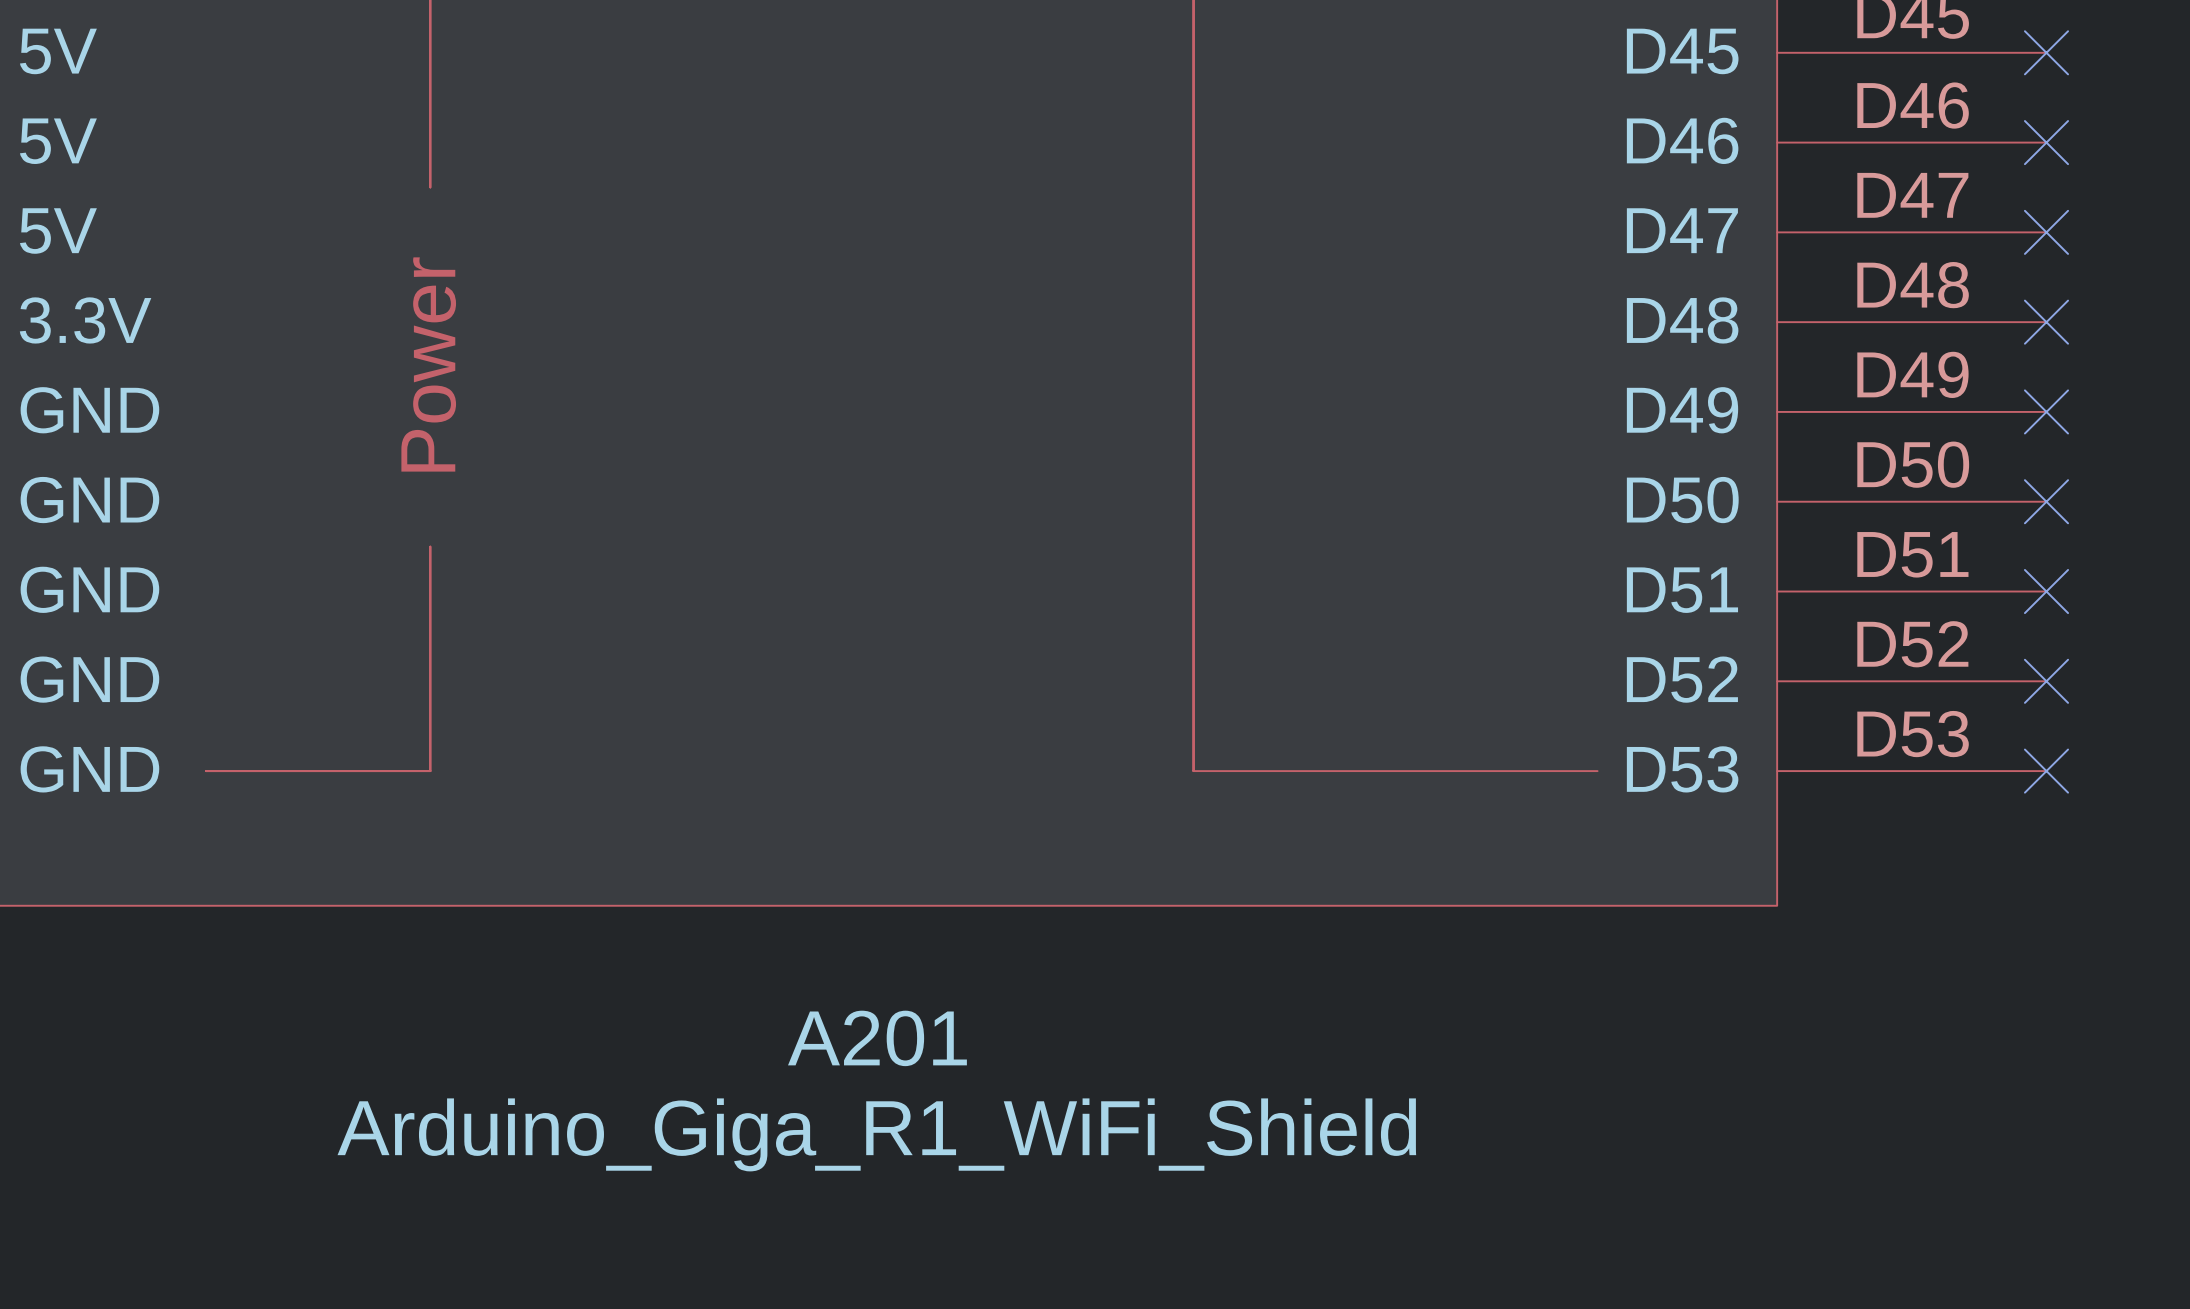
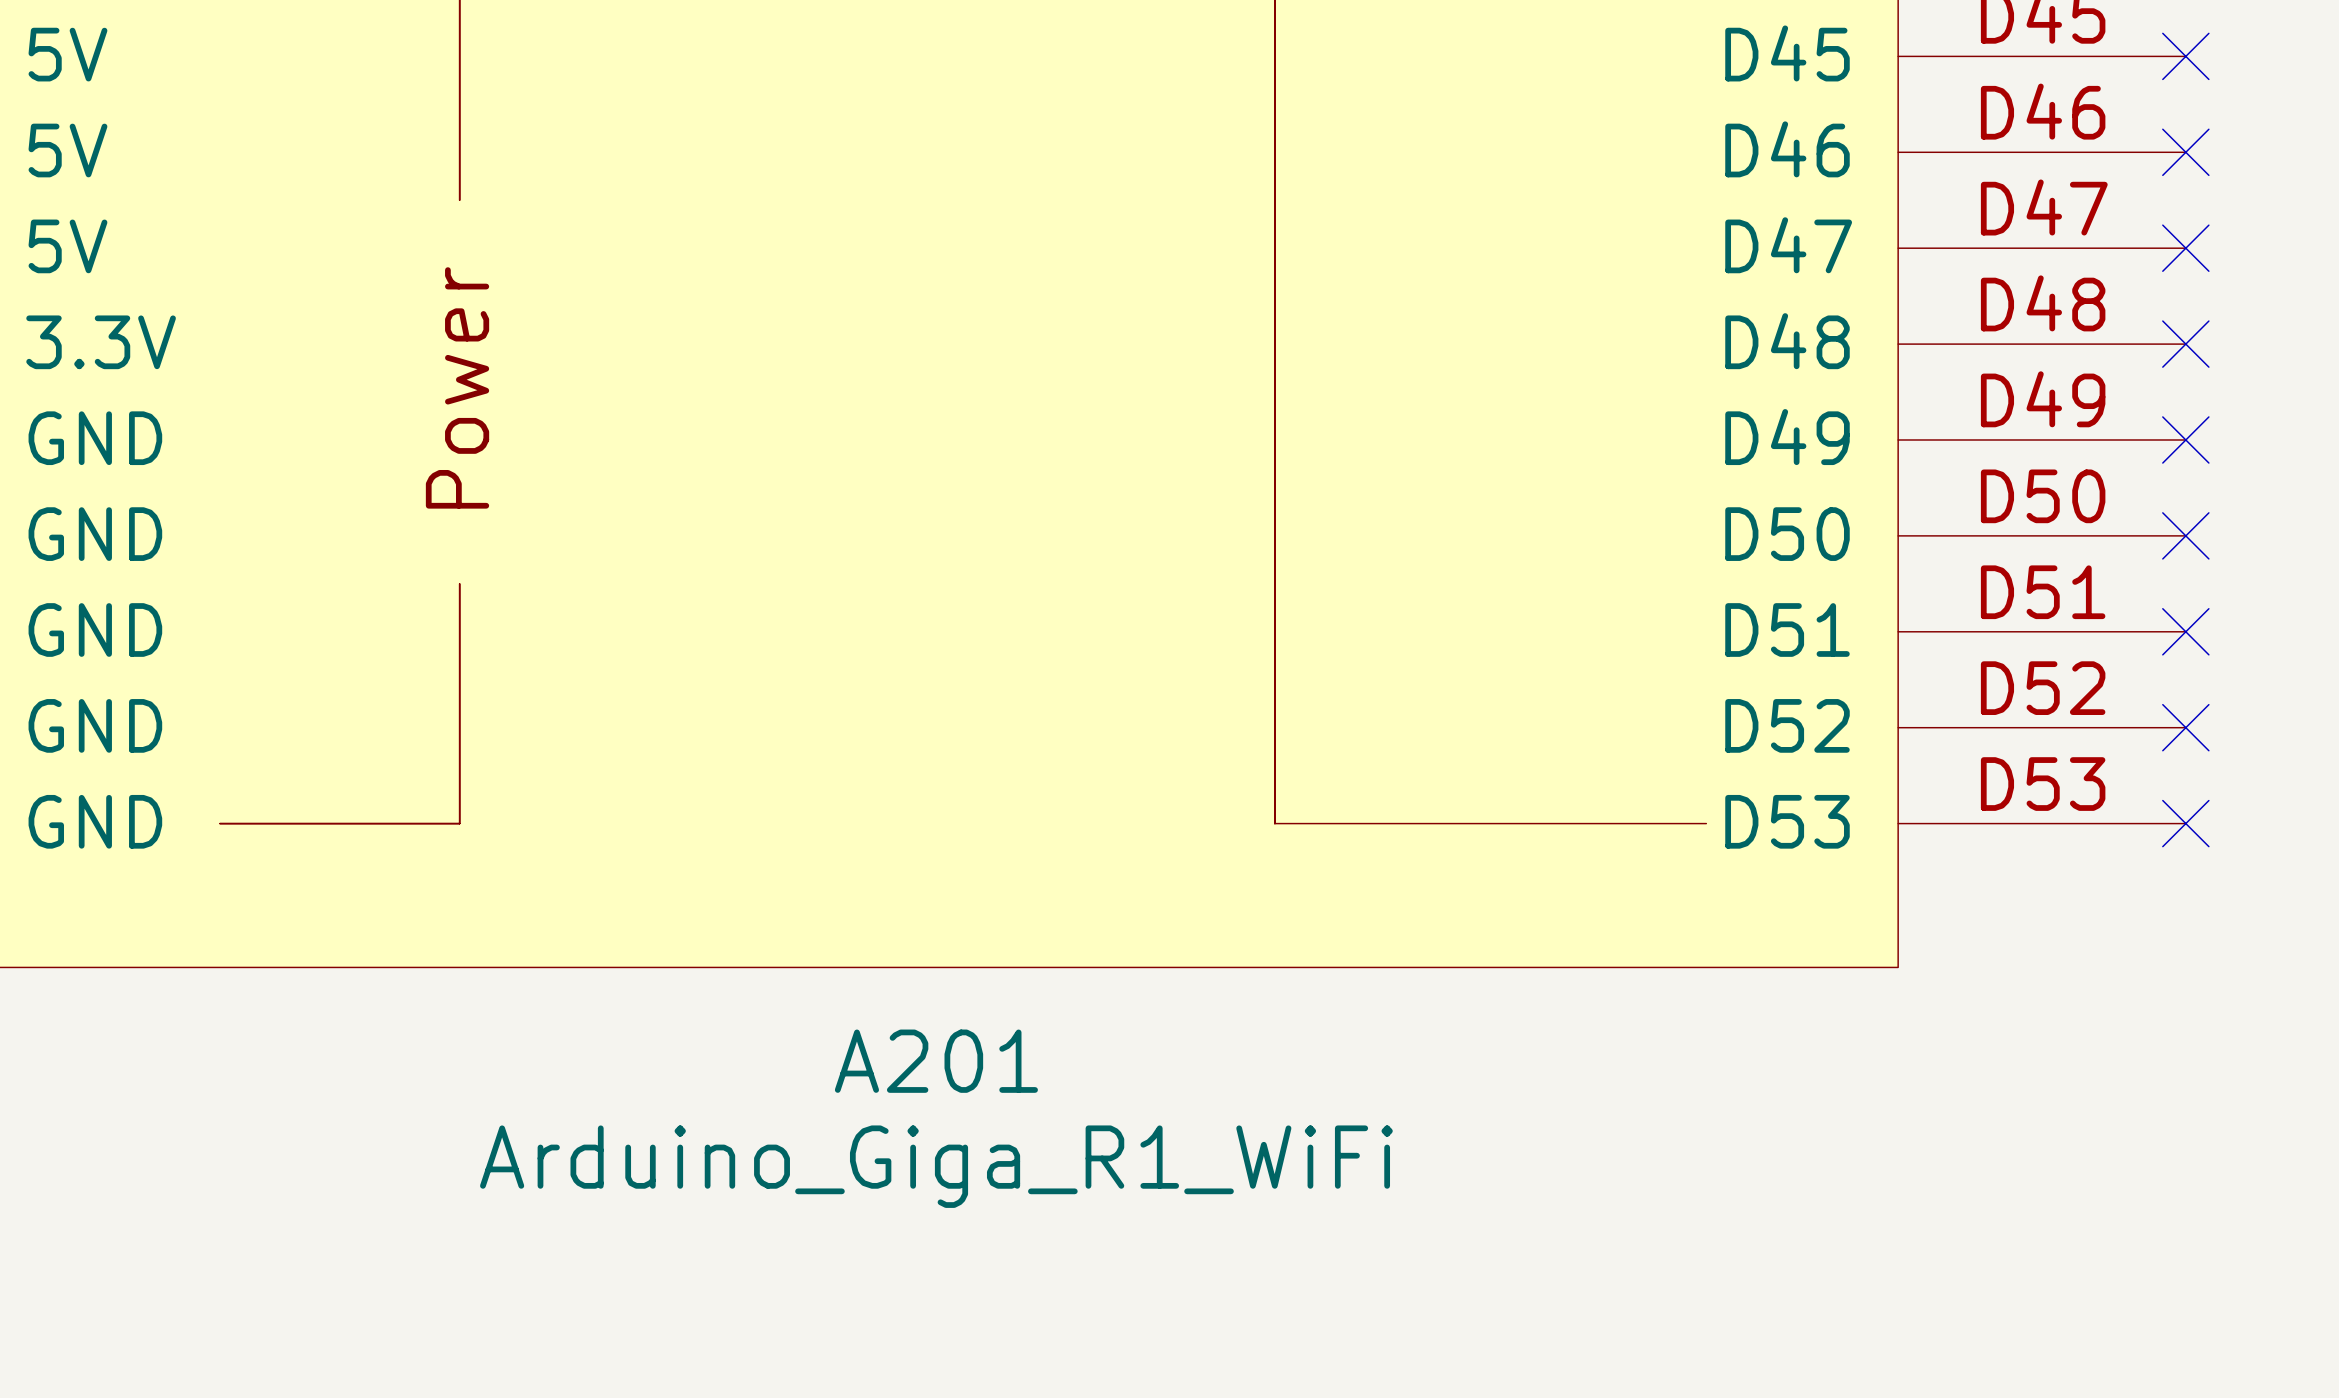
A201 name position: A201 (877, 1038) -> A201 (936, 1061)
A201 value: Arduino_Giga_R1_WiFi_Shield (876, 1134) -> Arduino_Giga_R1_WiFi (936, 1166)

